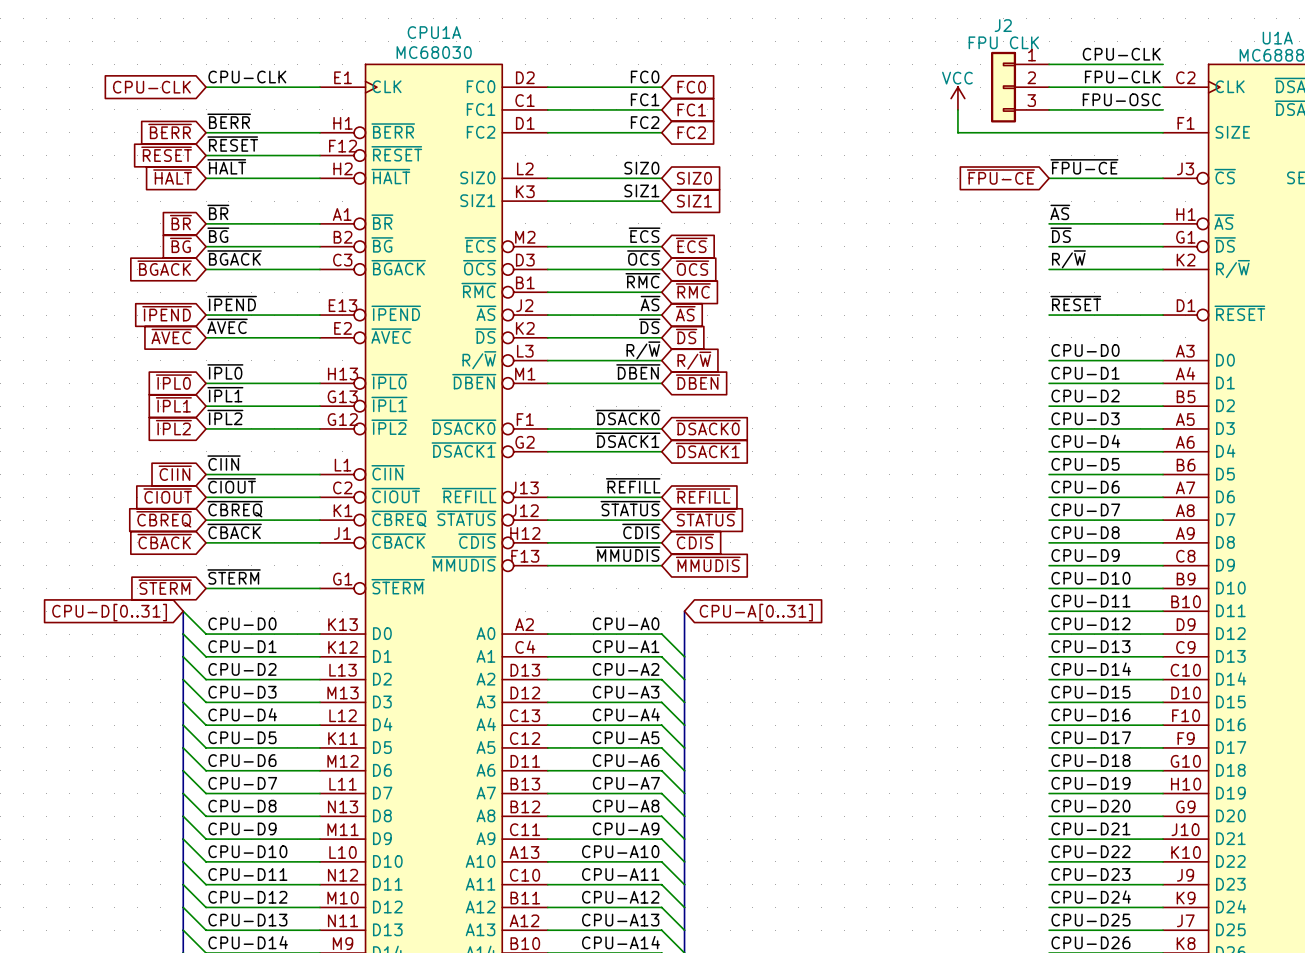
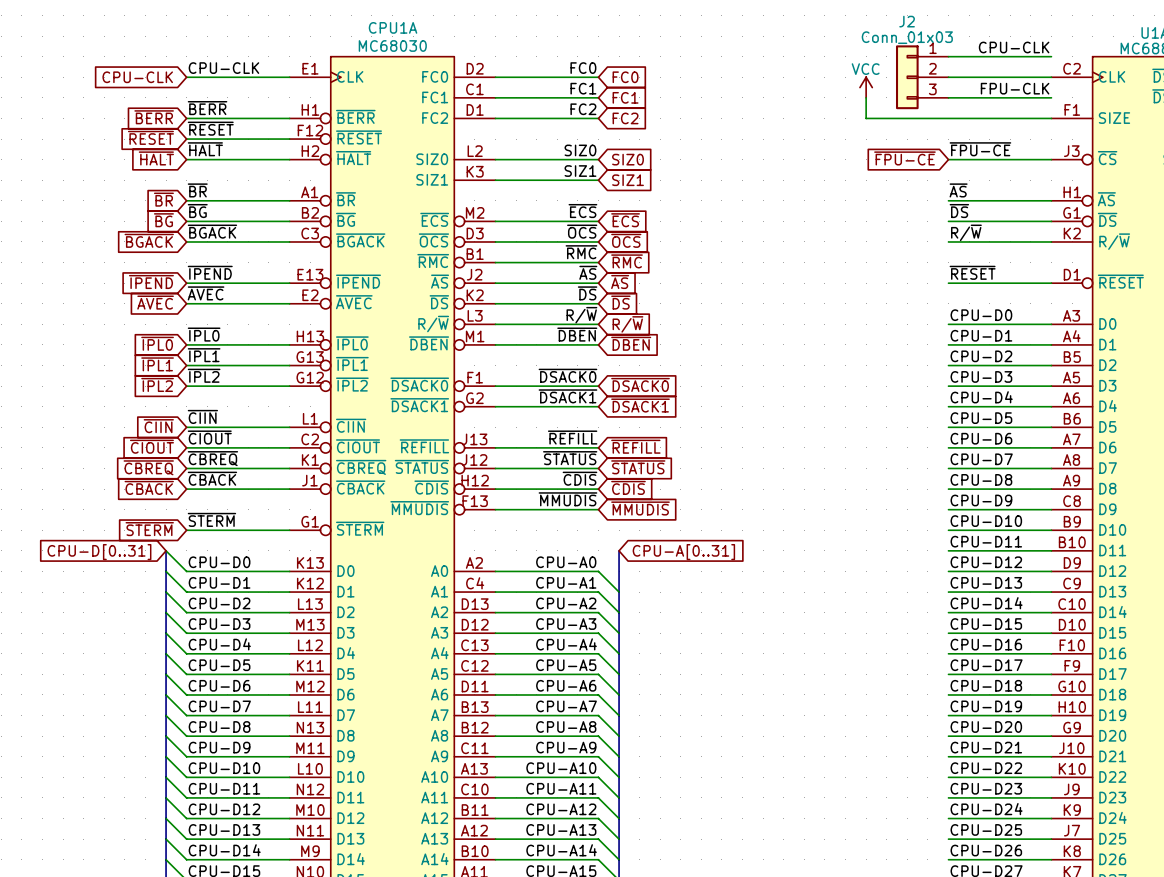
J2 value: FPU CLK (1003, 42) -> Conn_01x03 (907, 37)
label: FPU-CLK (1122, 77) -> none
label: FPU-OSC (1121, 99) -> FPU-CLK (1015, 88)

